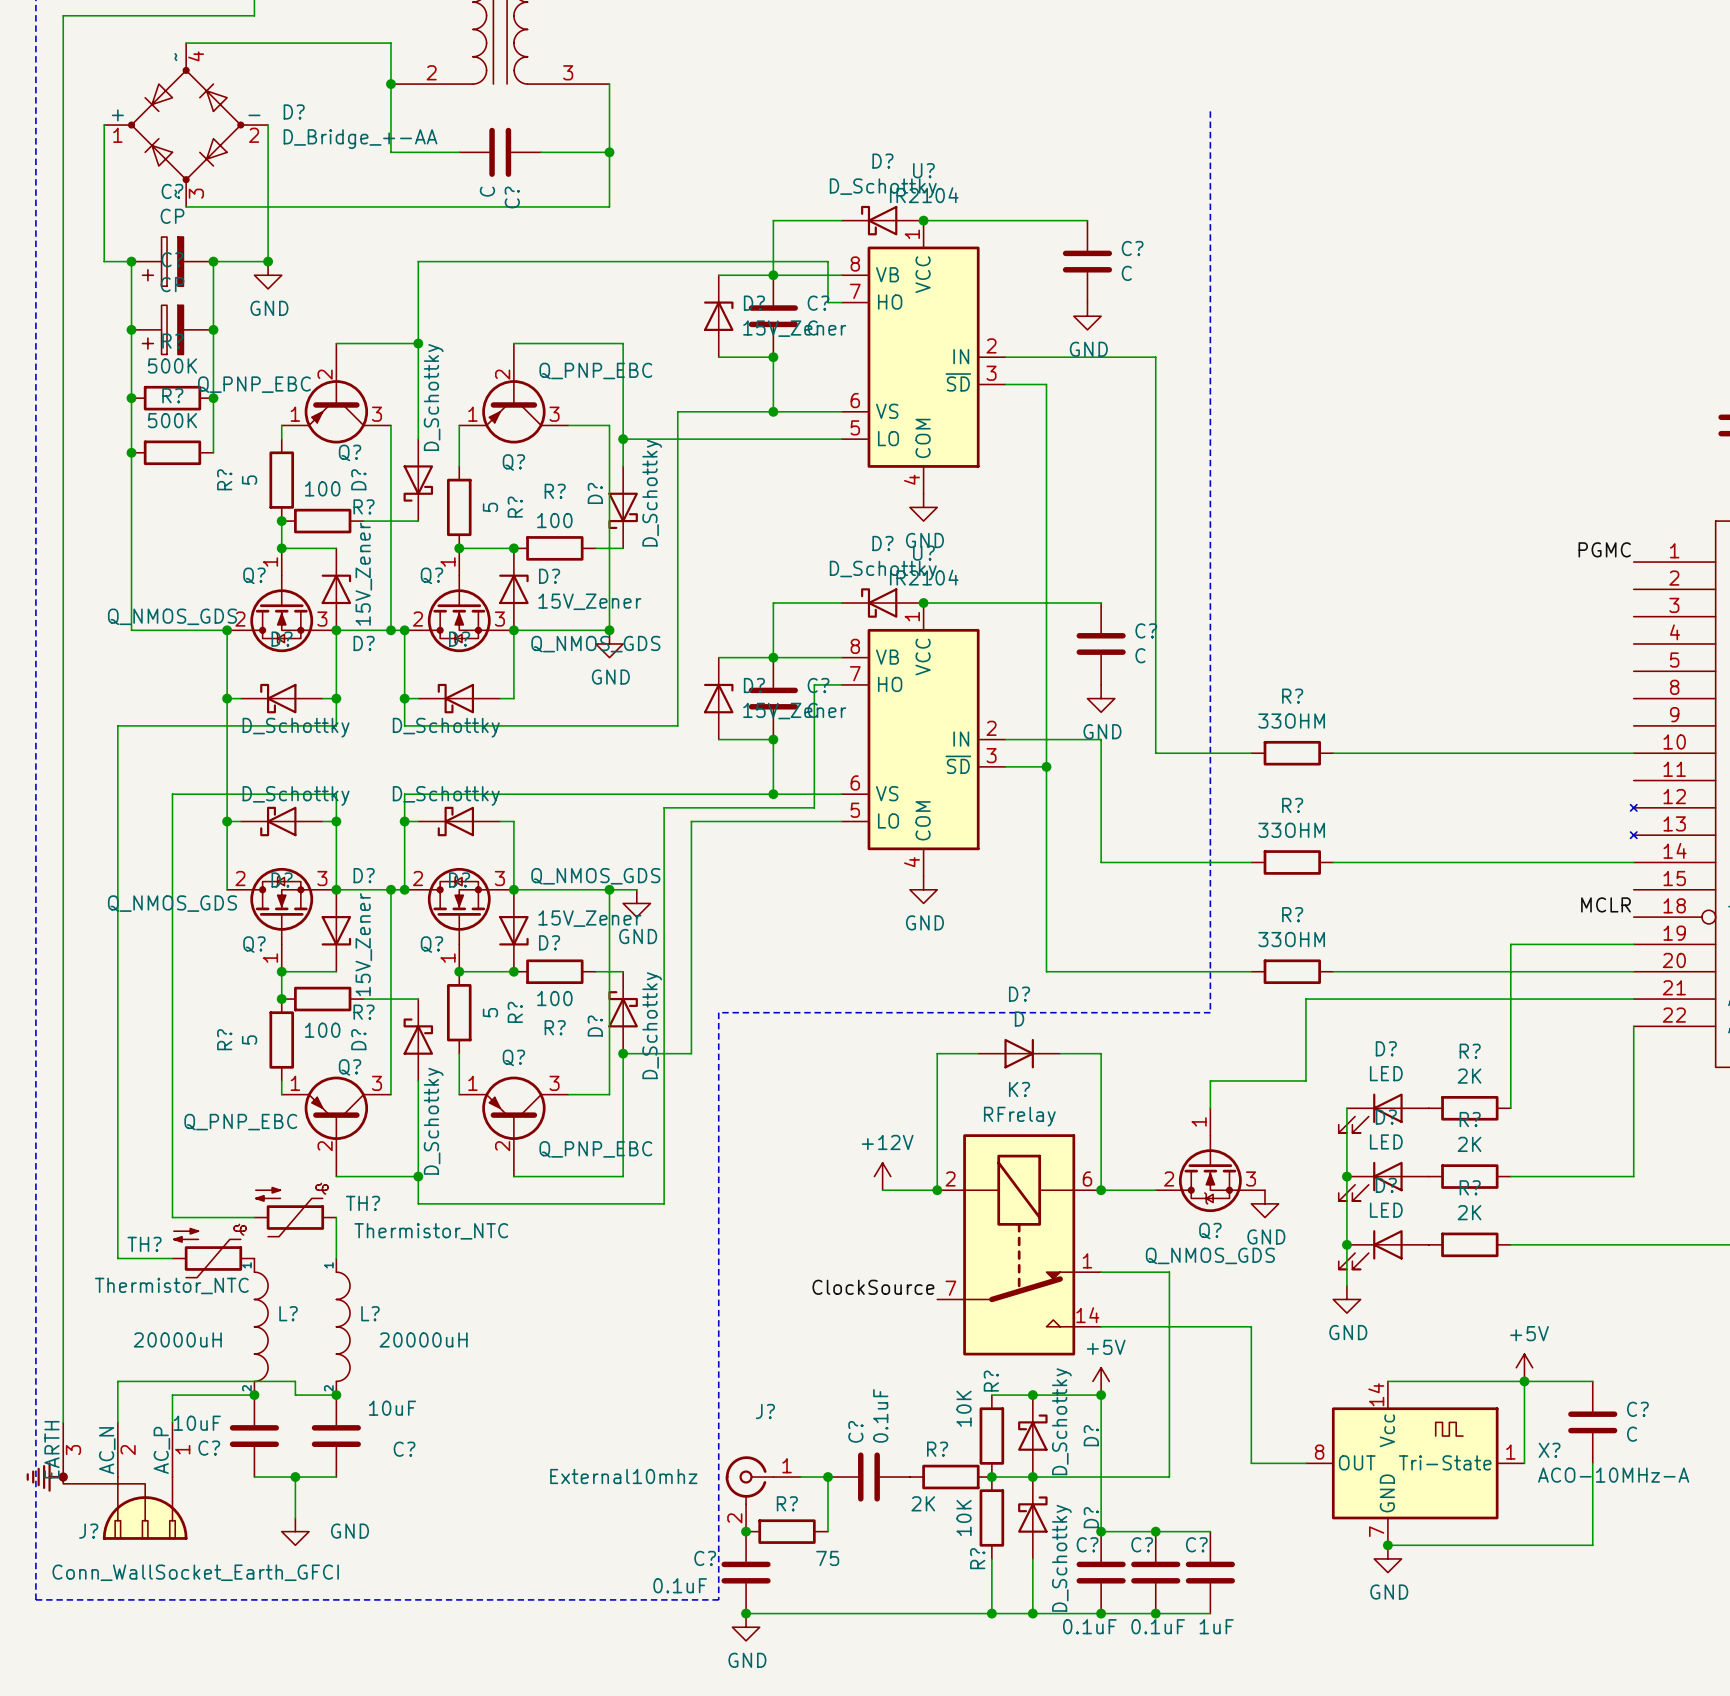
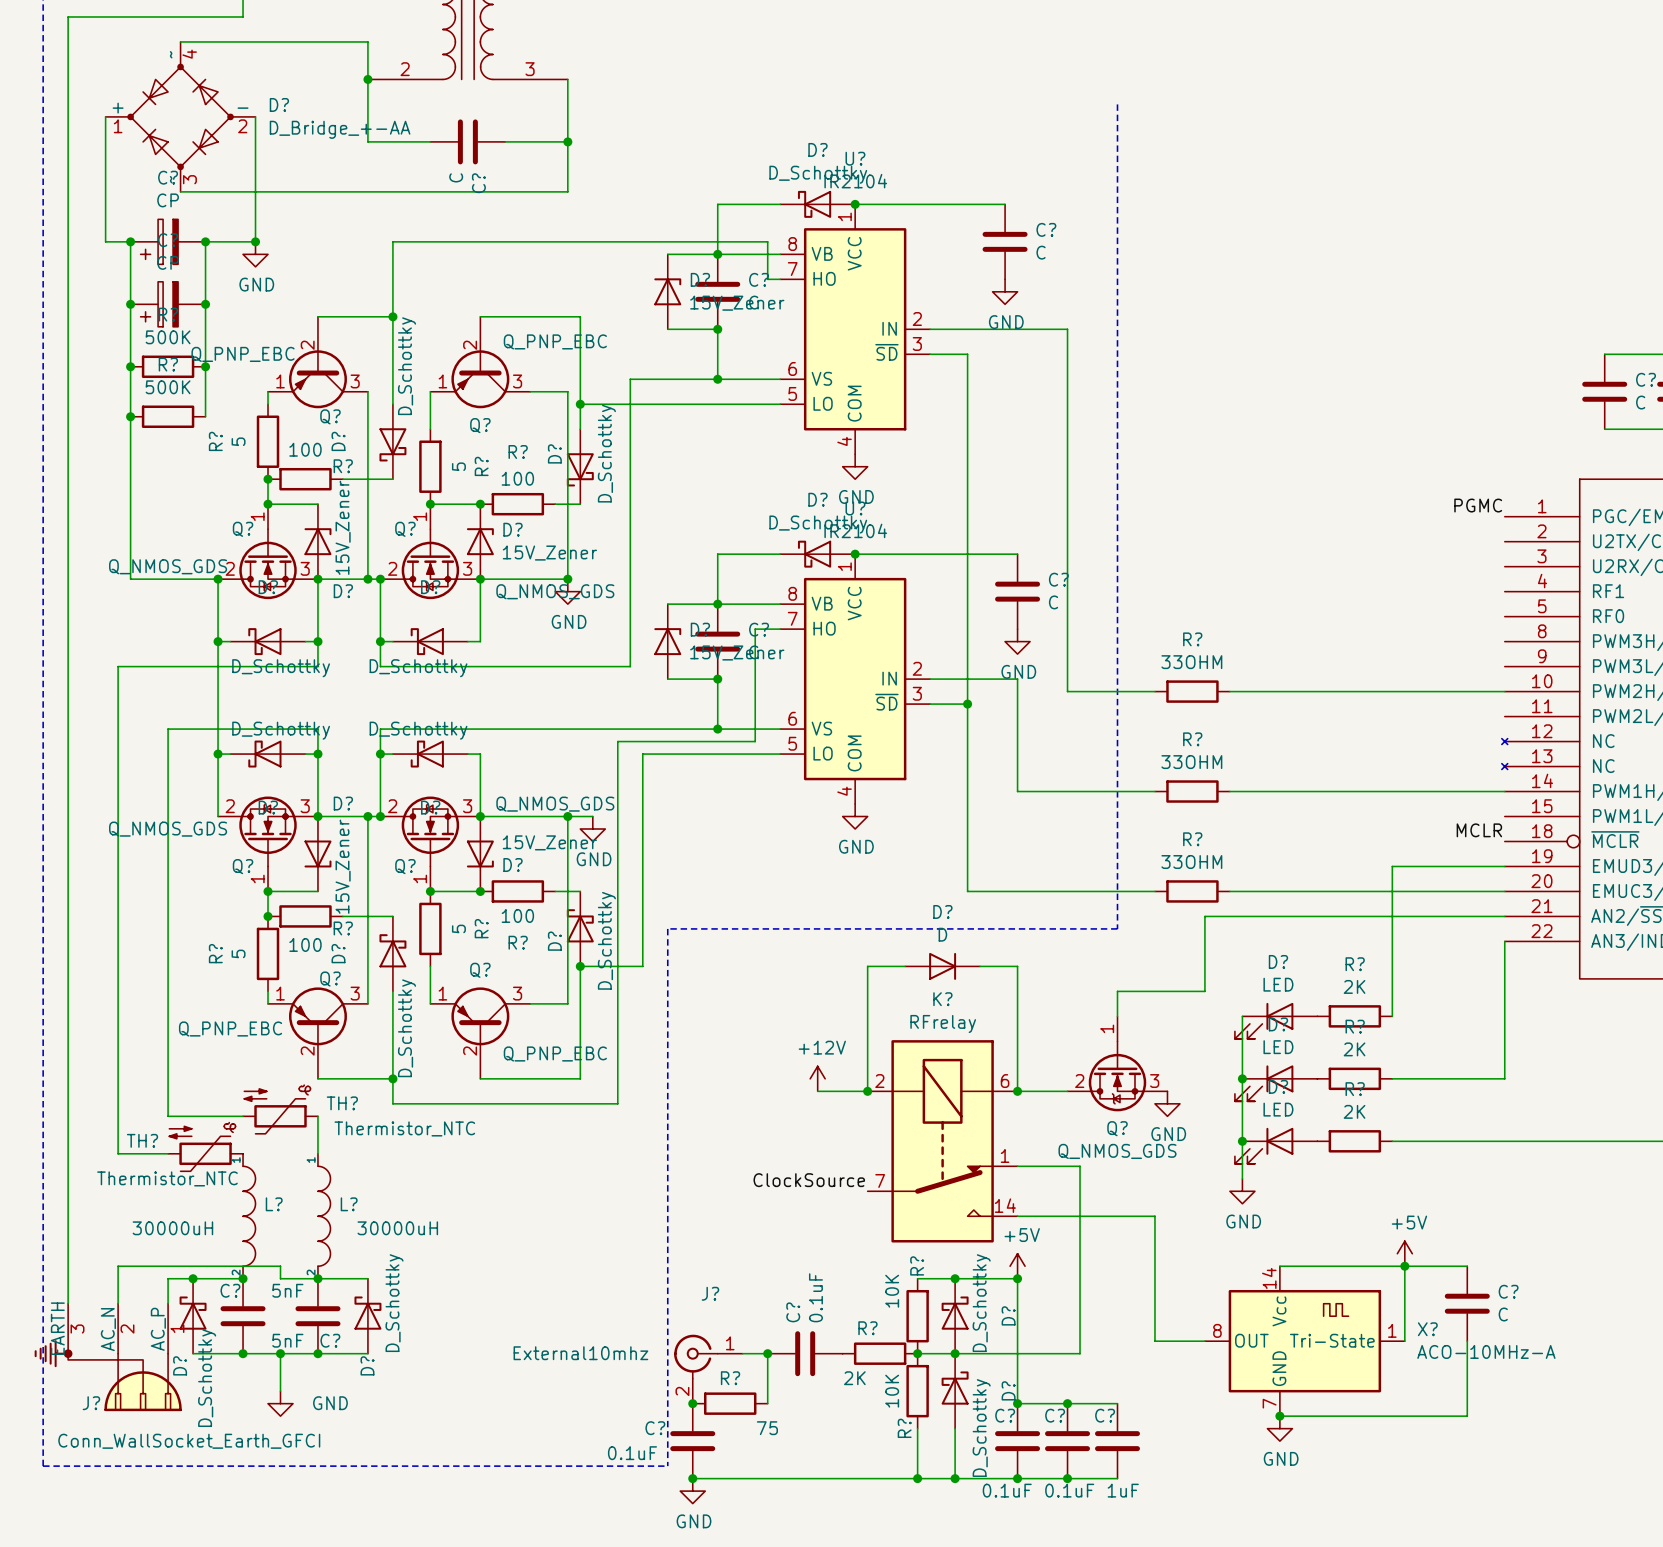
L? value: 20000uH (177, 1339) -> 30000uH (172, 1228)
L? value: 20000uH (423, 1339) -> 30000uH (397, 1228)
junction: none -> (193, 1278)
wire: none -> (317, 1278) (367, 1278)
C? value: 10uF (392, 1408) -> 5nF (287, 1290)
C? value: 10uF (197, 1423) -> 5nF (287, 1340)
D?: none -> D_Schottky (193, 1316)
D?: none -> D_Schottky (367, 1316)
C? name position: C? (209, 1448) -> C? (230, 1290)
C? name position: C? (404, 1449) -> C? (330, 1340)
wire: none -> (193, 1353) (243, 1353)
junction: none -> (243, 1353)
wire: none -> (317, 1353) (367, 1353)
junction: none -> (317, 1353)

